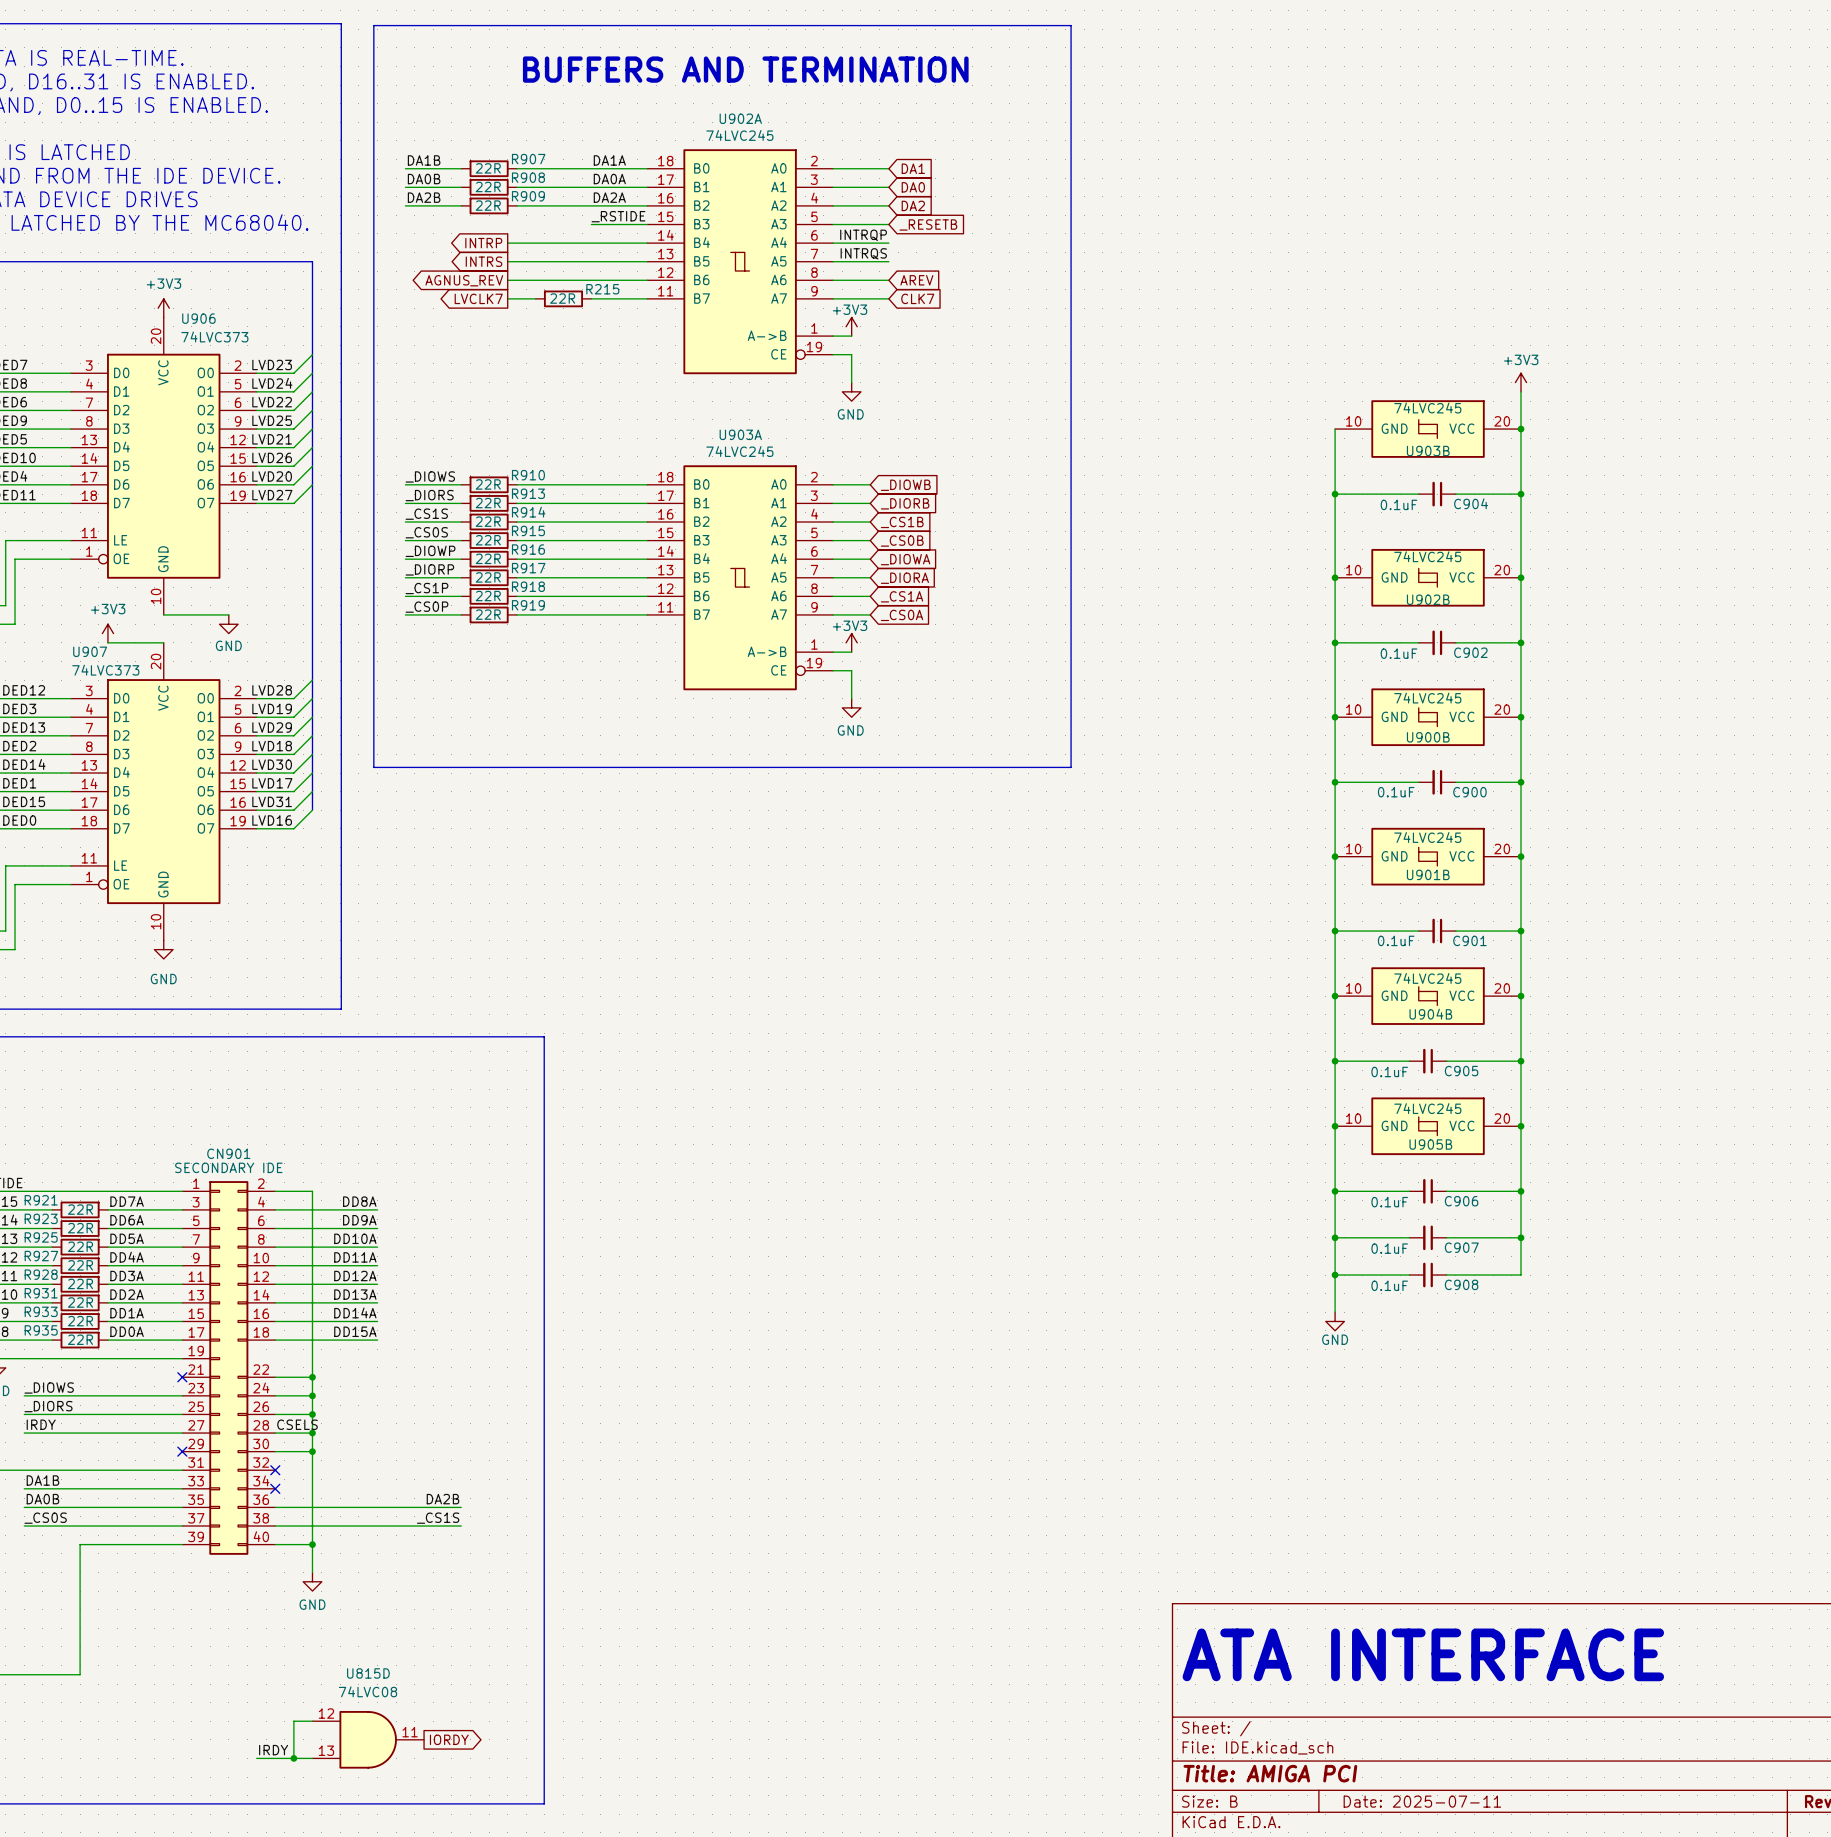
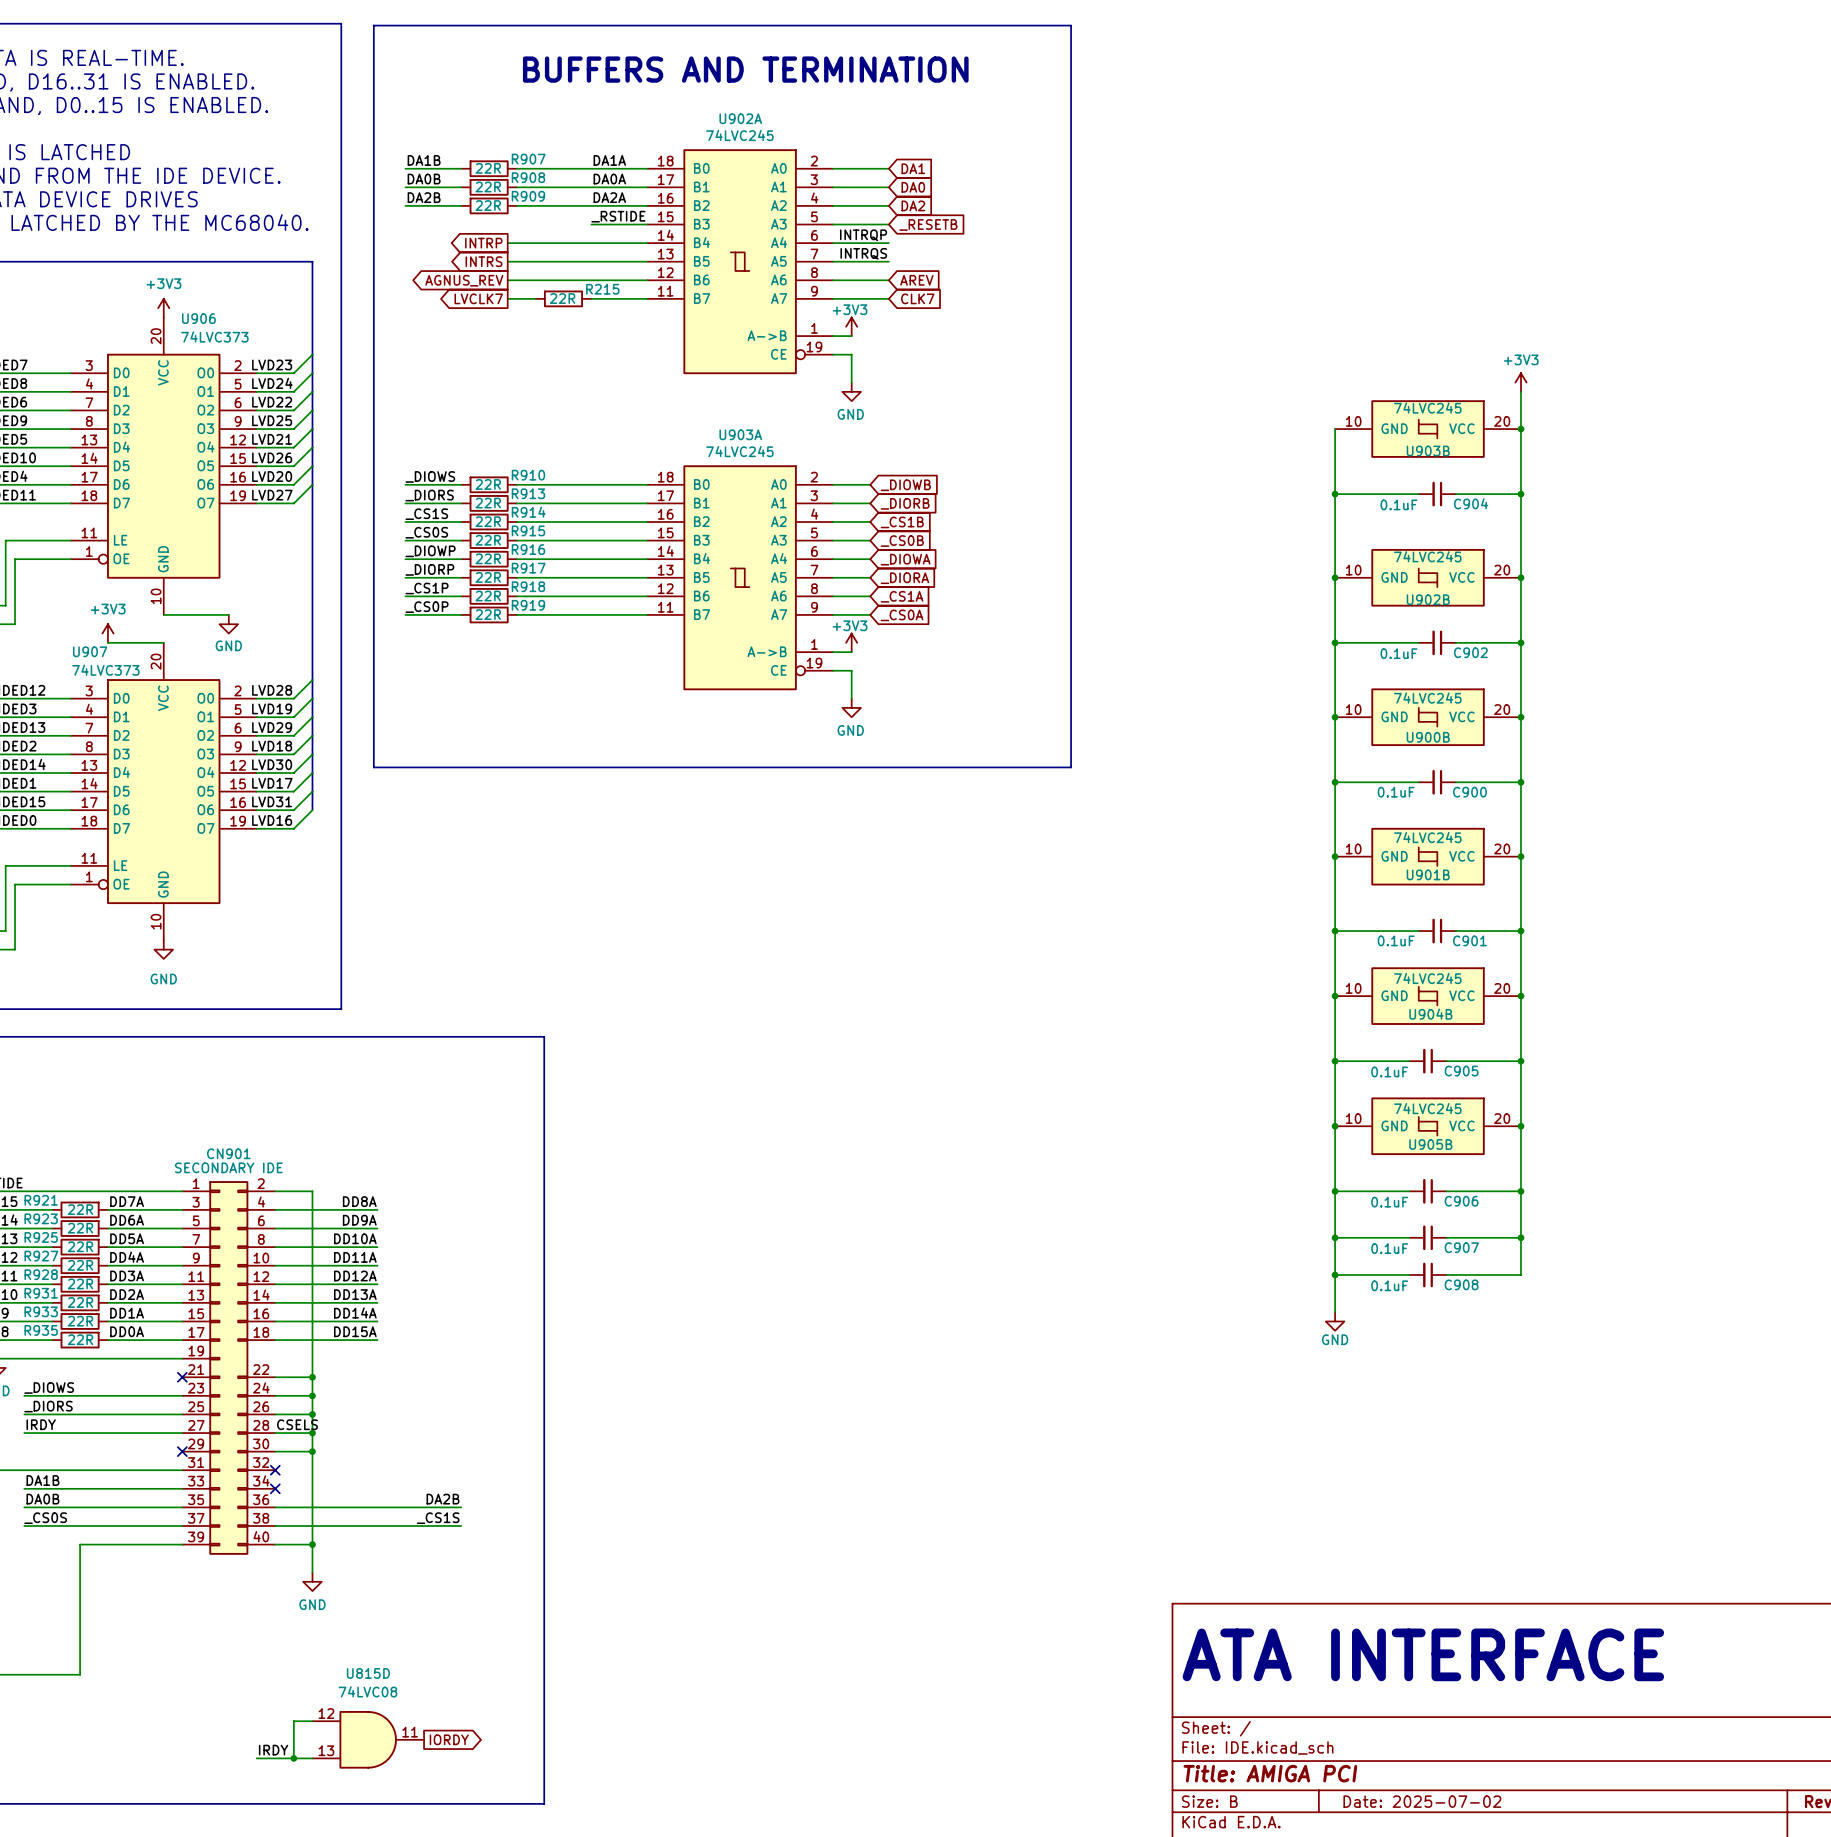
title block: Date: 2025-07-11 (1422, 1801) -> Date: 2025-07-02 (1422, 1801)

